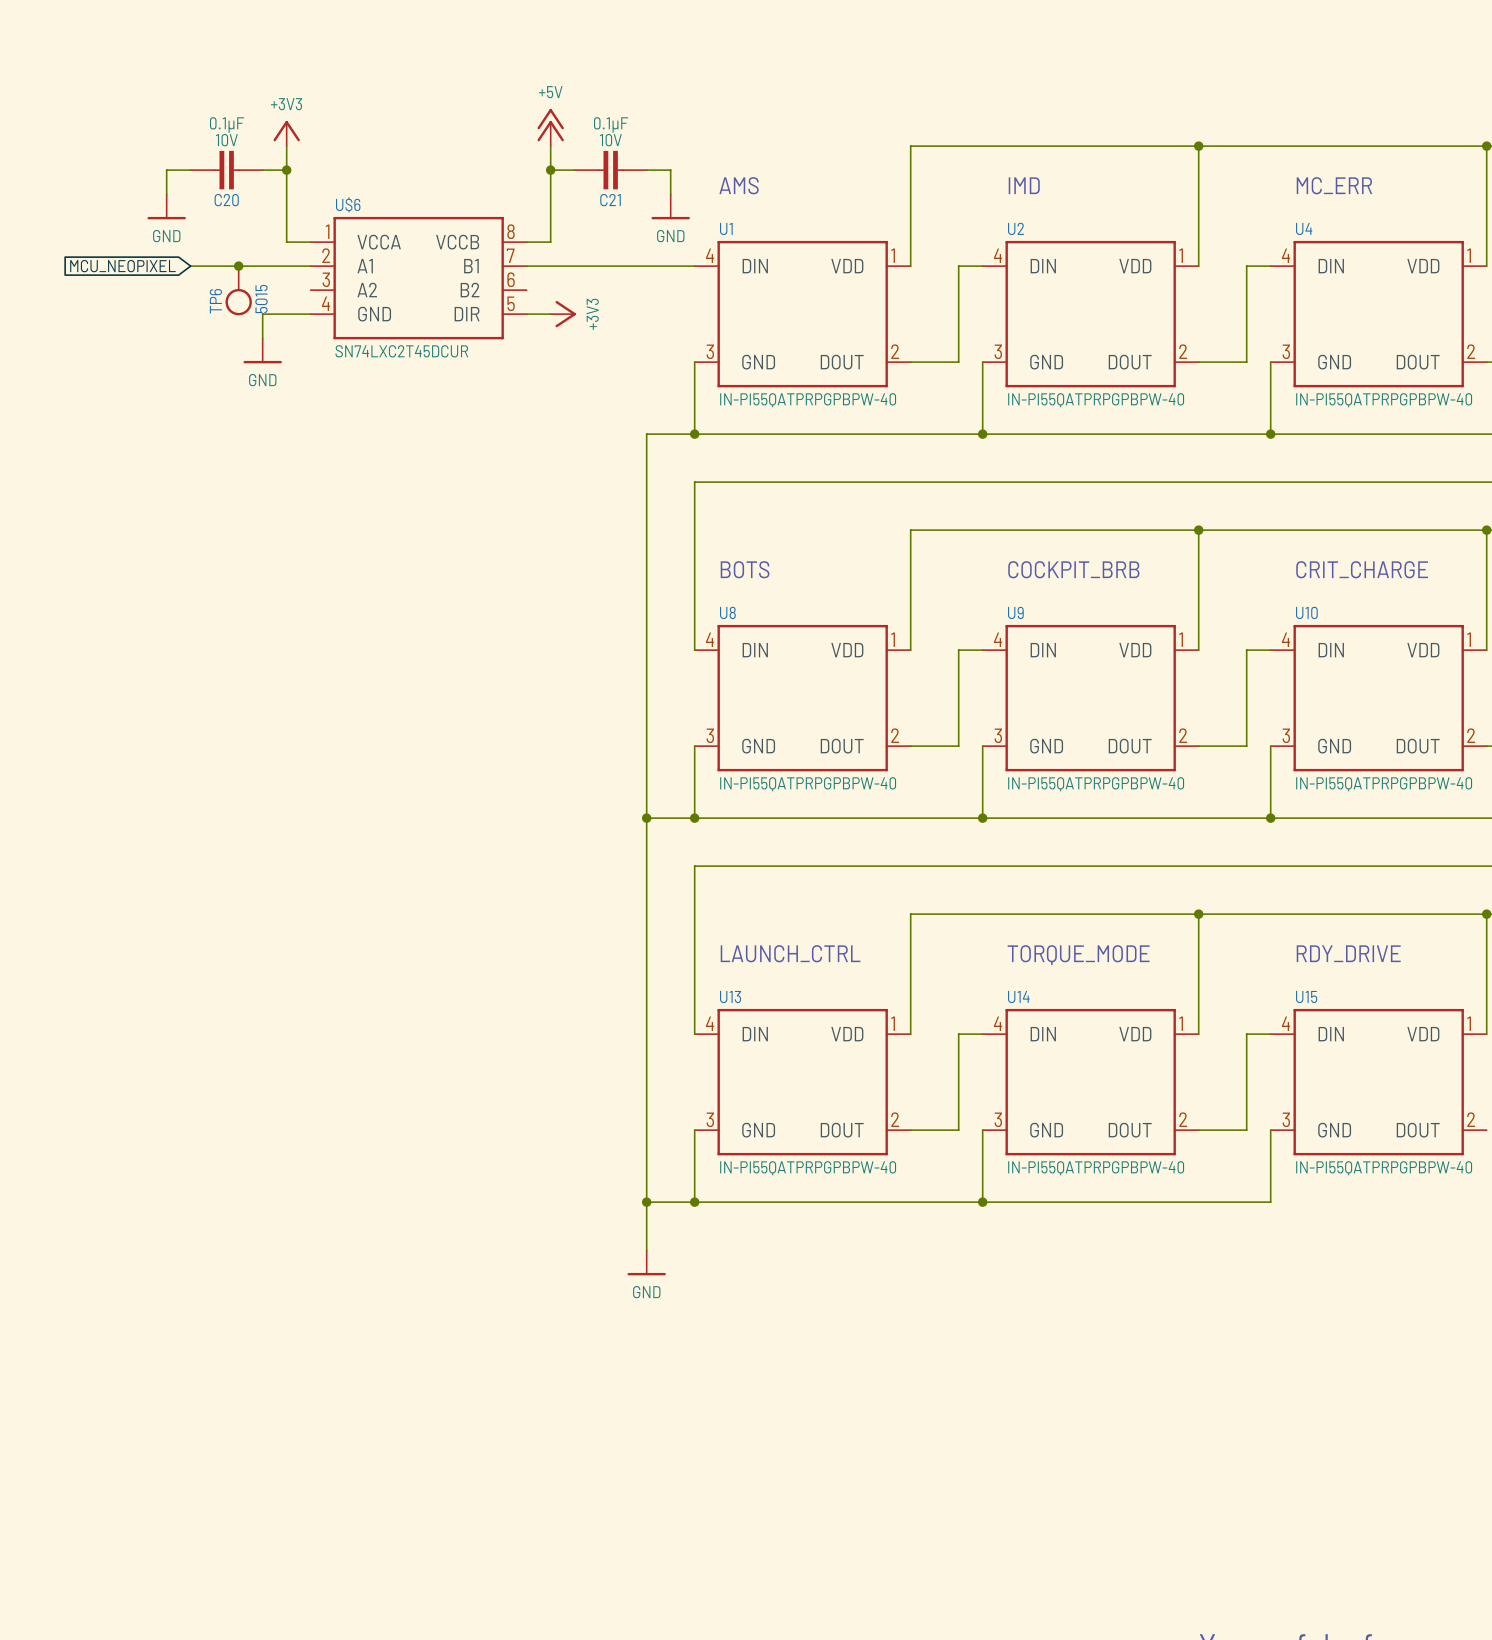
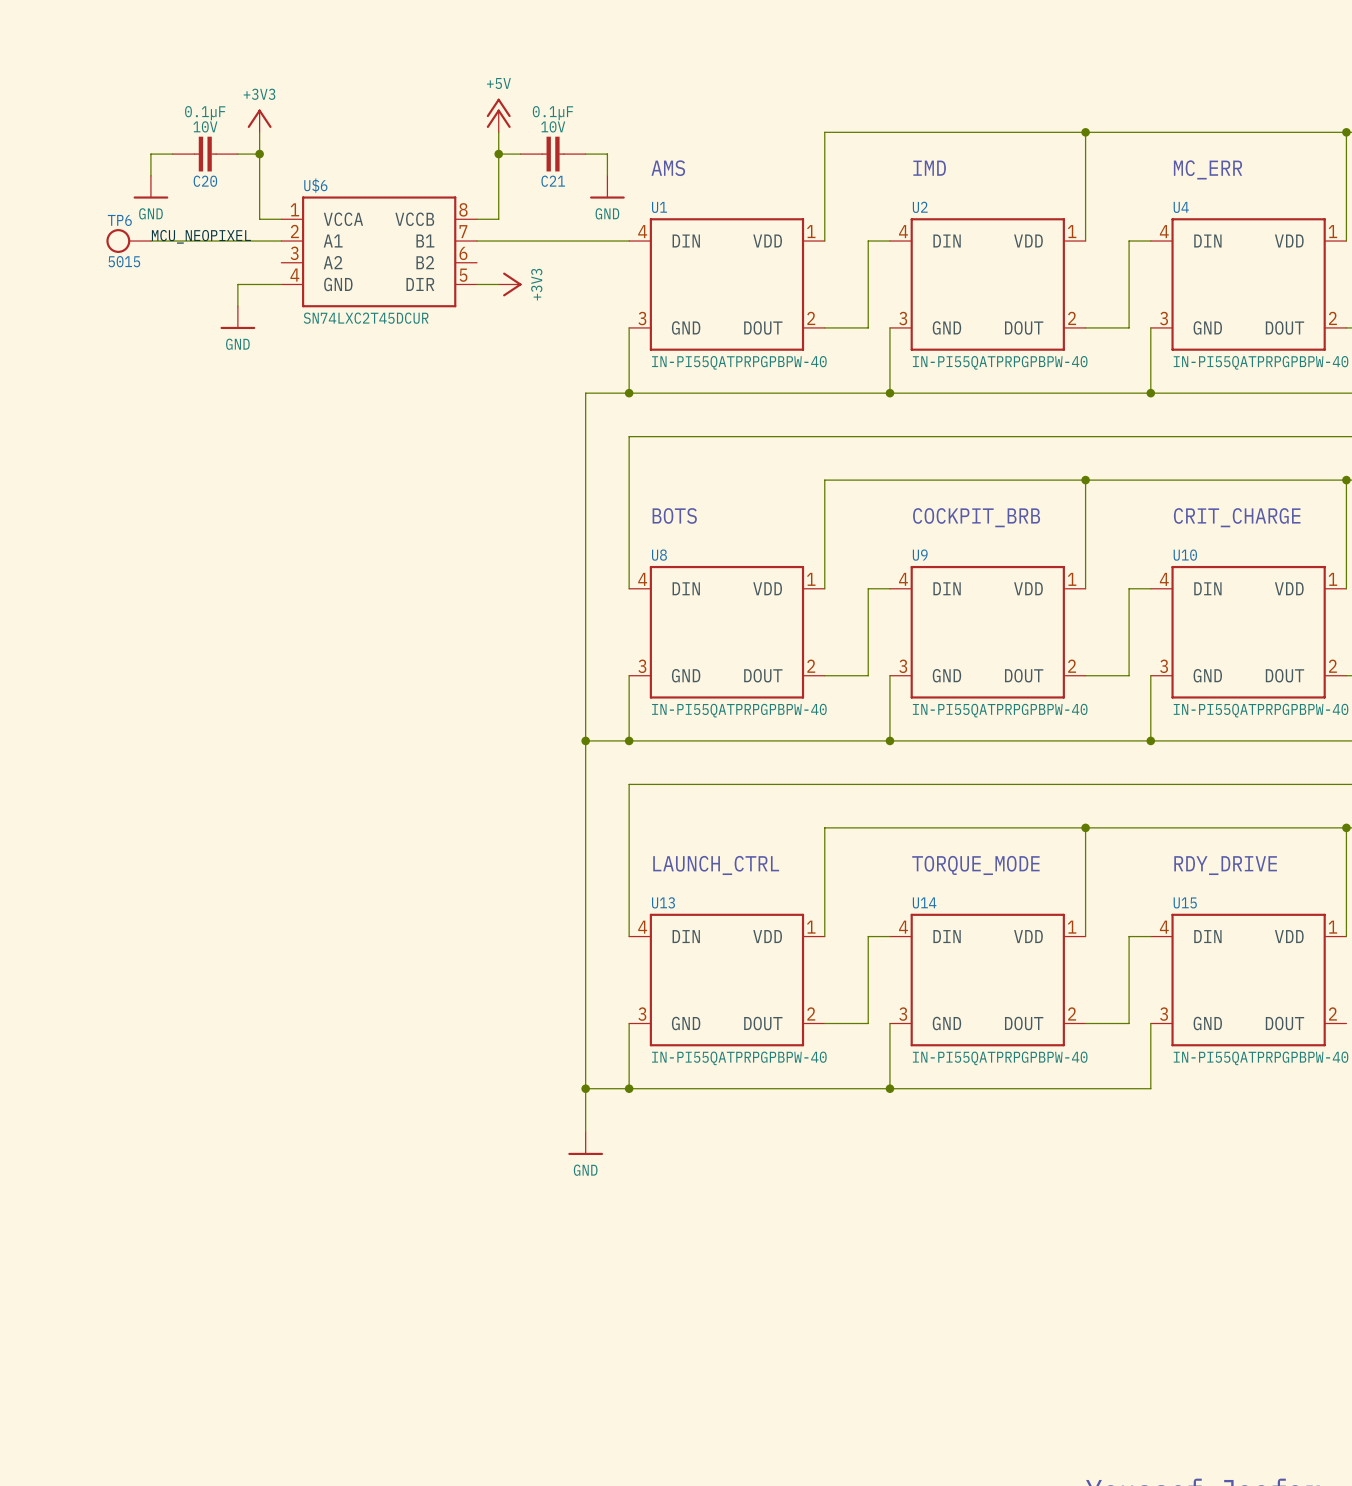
label: none -> MCU_NEOPIXEL (201, 236)
global label: MCU_NEOPIXEL (122, 266) -> none
wire: none -> (150, 241) (172, 241)
junction: (238, 266) -> none
TP6 position: (238, 290) -> (128, 241)
TP6 rotation: 0° (238, 302) -> 90° clockwise (118, 241)

